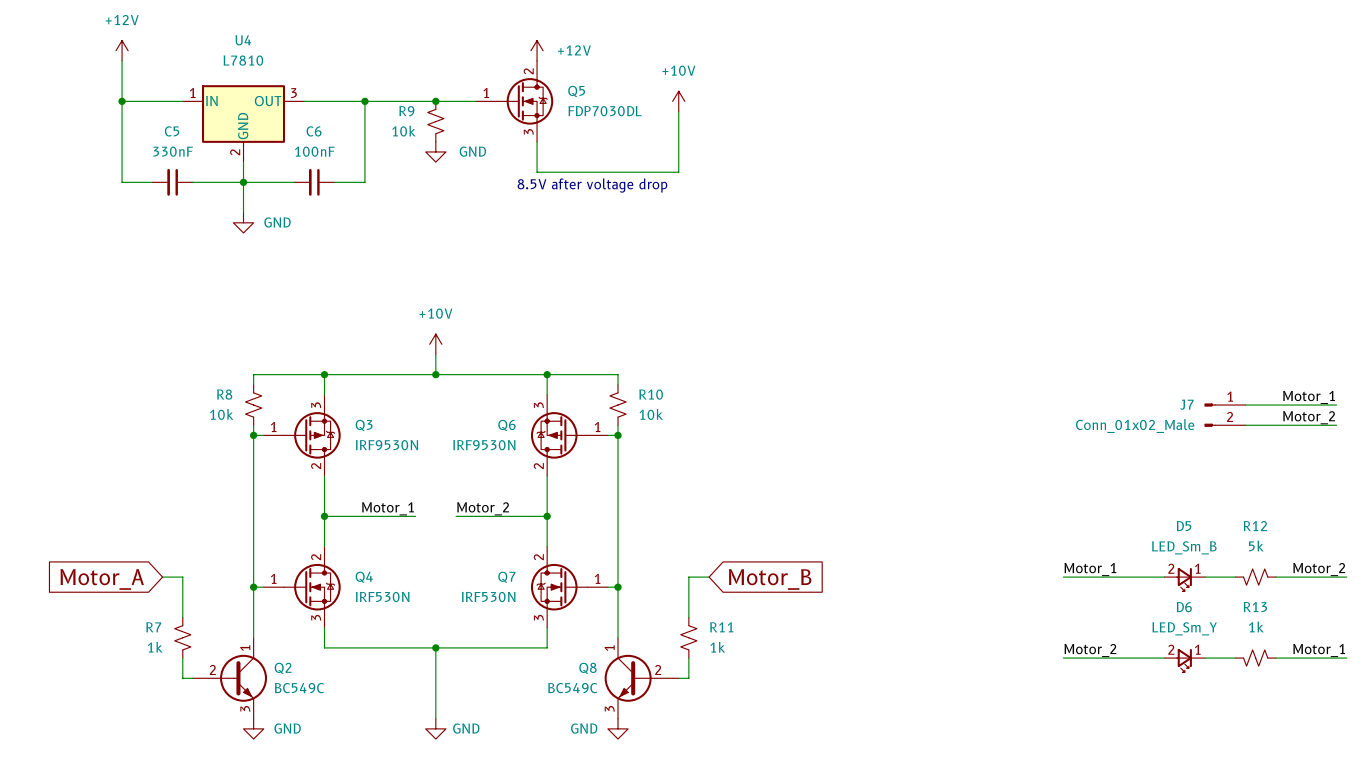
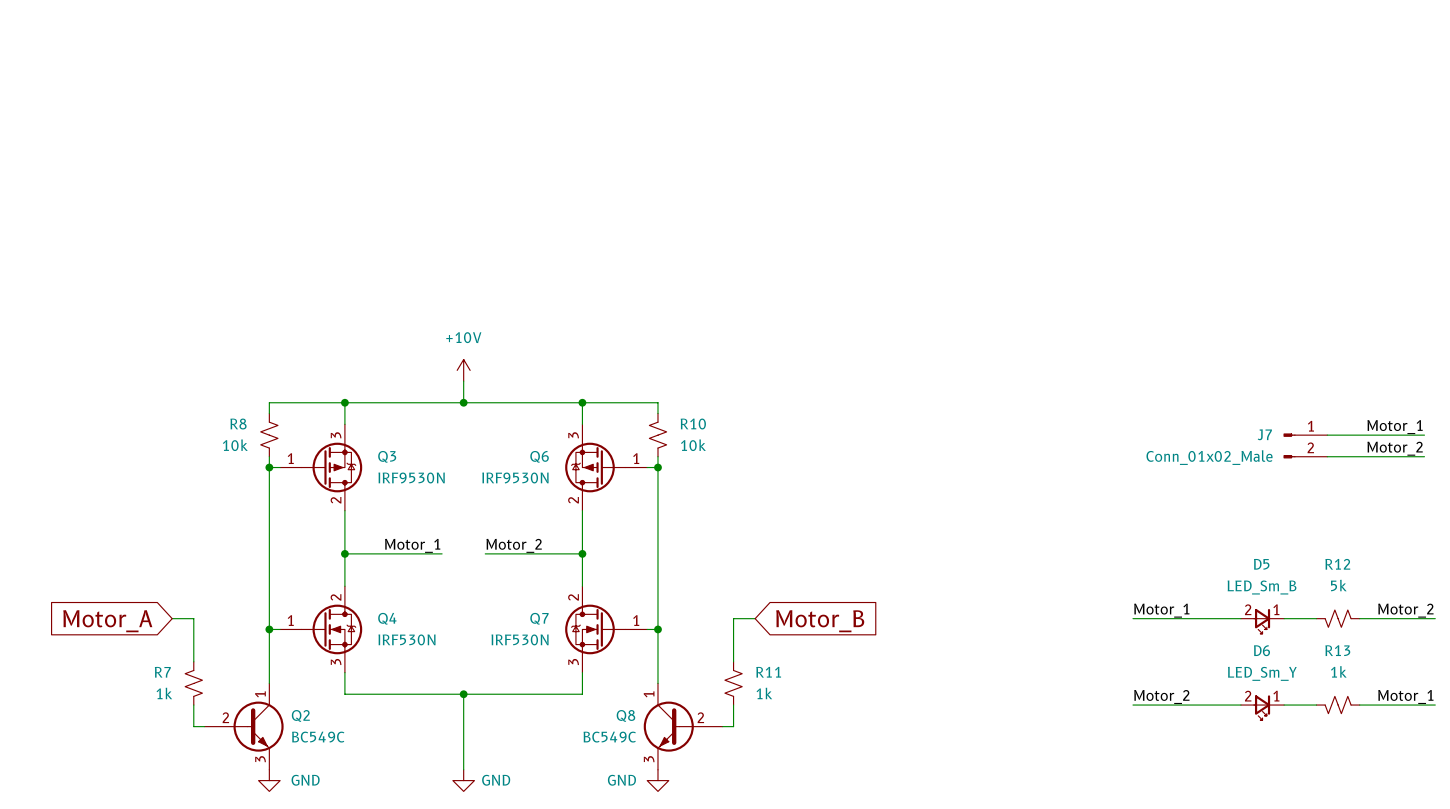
power symbol: +12V (122, 50) -> none
power symbol: +12V (537, 50) -> none
wire: (122, 60) (122, 182) (152, 182) -> none
wire: (122, 101) (182, 101) -> none
junction: (122, 101) -> none
wire: (304, 101) (476, 101) -> none
wire: (364, 101) (364, 182) (334, 182) -> none
junction: (364, 101) -> none
junction: (435, 101) -> none
Q5: FDP7030DL (514, 101) -> none
power symbol: +10V (678, 101) -> none
wire: (678, 111) (678, 172) (537, 172) (537, 141) -> none
R9: 10k (435, 121) -> none
U4: L7810 (243, 123) -> none
power symbol: GND (435, 151) -> none
wire: (243, 162) (243, 212) -> none
C5: 330nF (172, 182) -> none
wire: (192, 182) (294, 182) -> none
junction: (243, 182) -> none
C6: 100nF (314, 182) -> none
text: 8.5V after voltage drop (592, 185) -> none
power symbol: GND (243, 222) -> none

